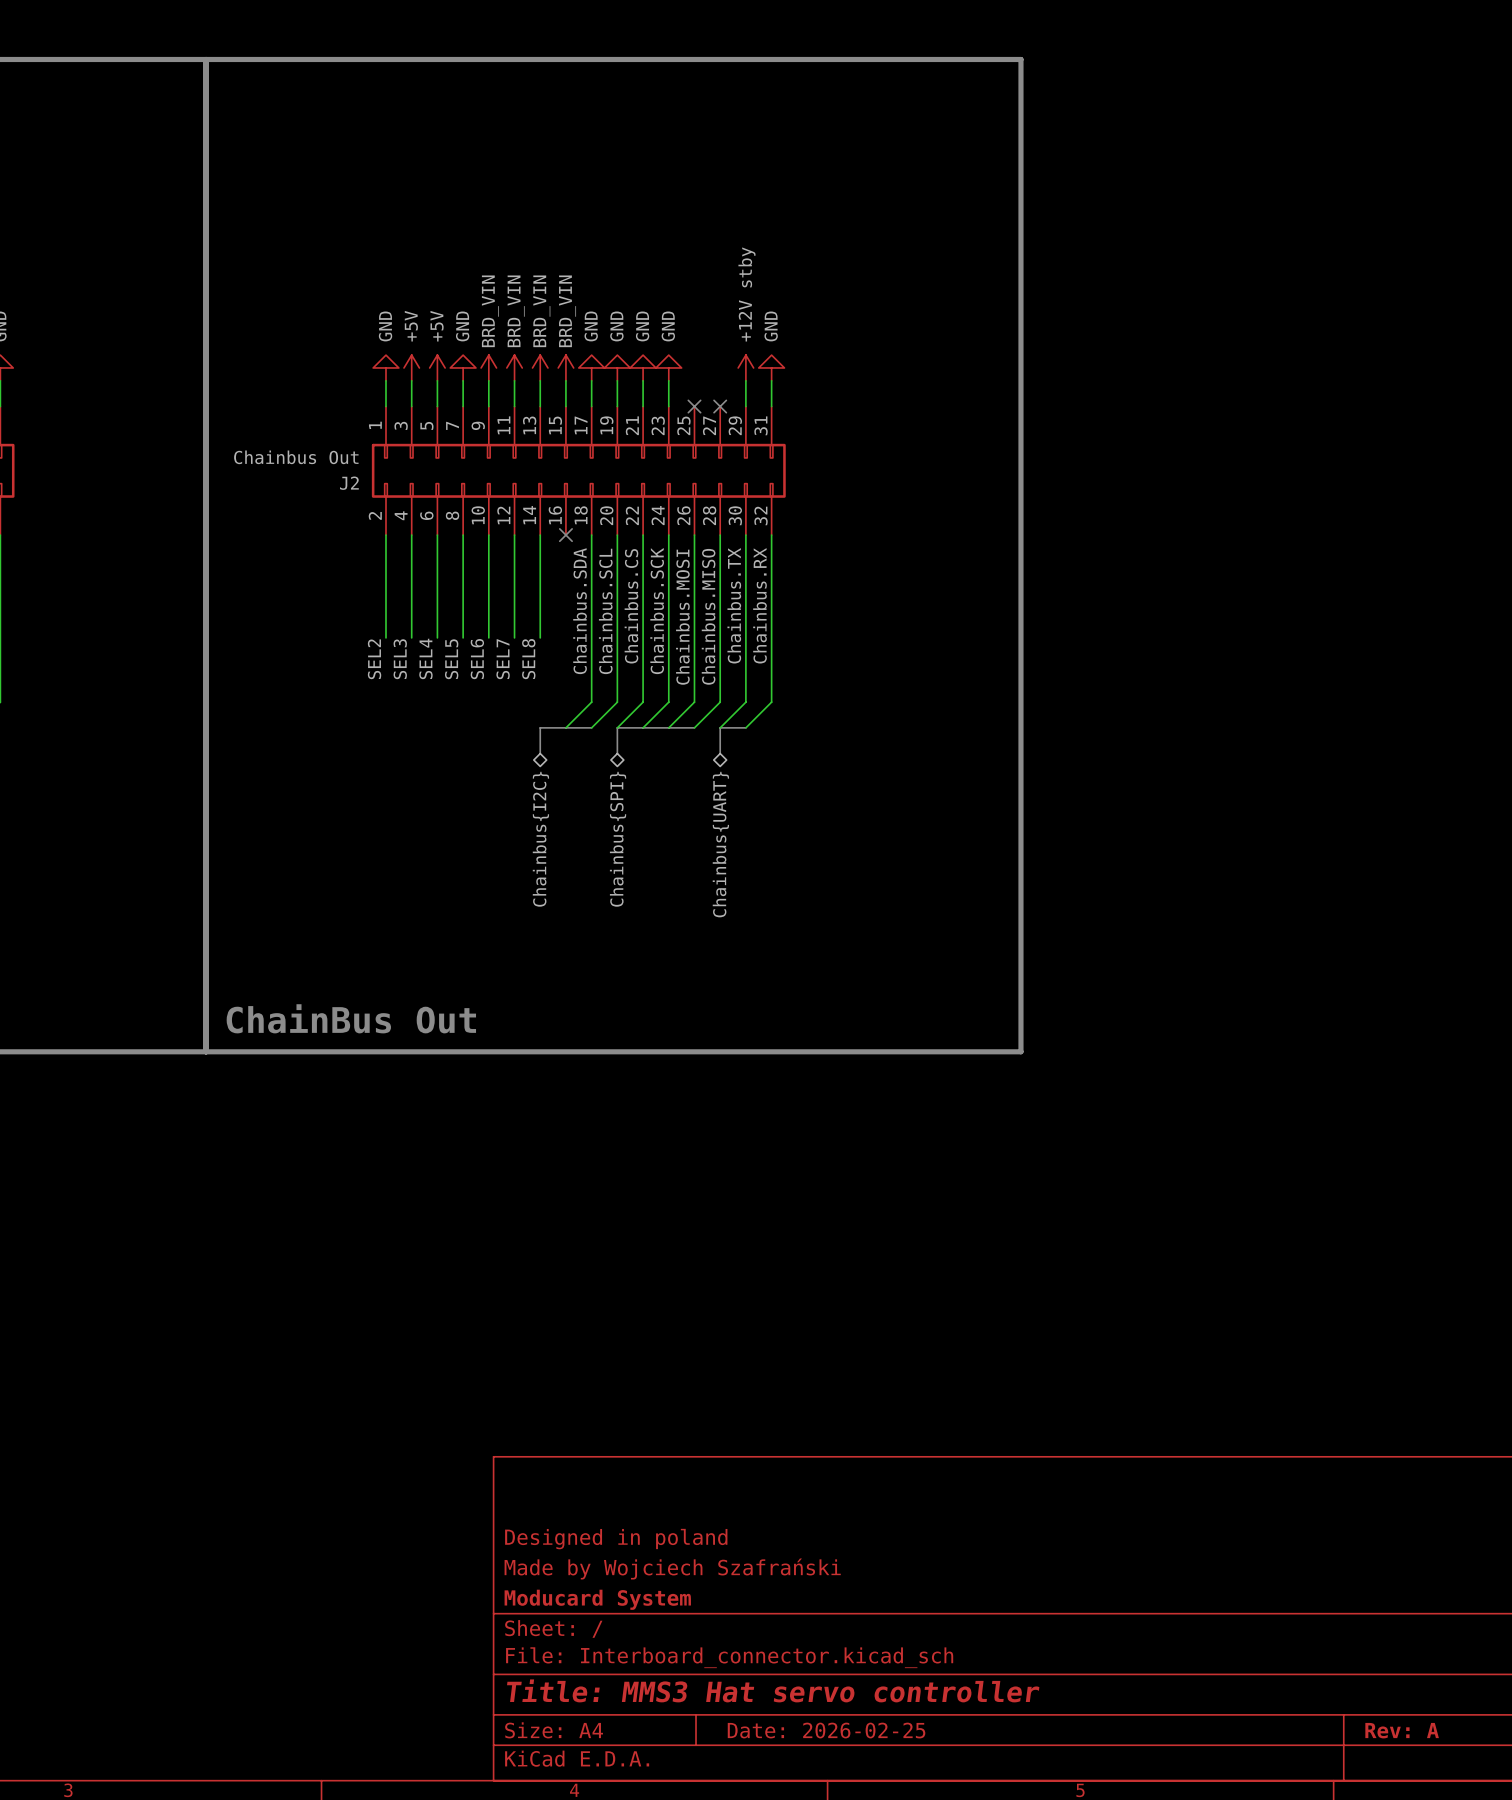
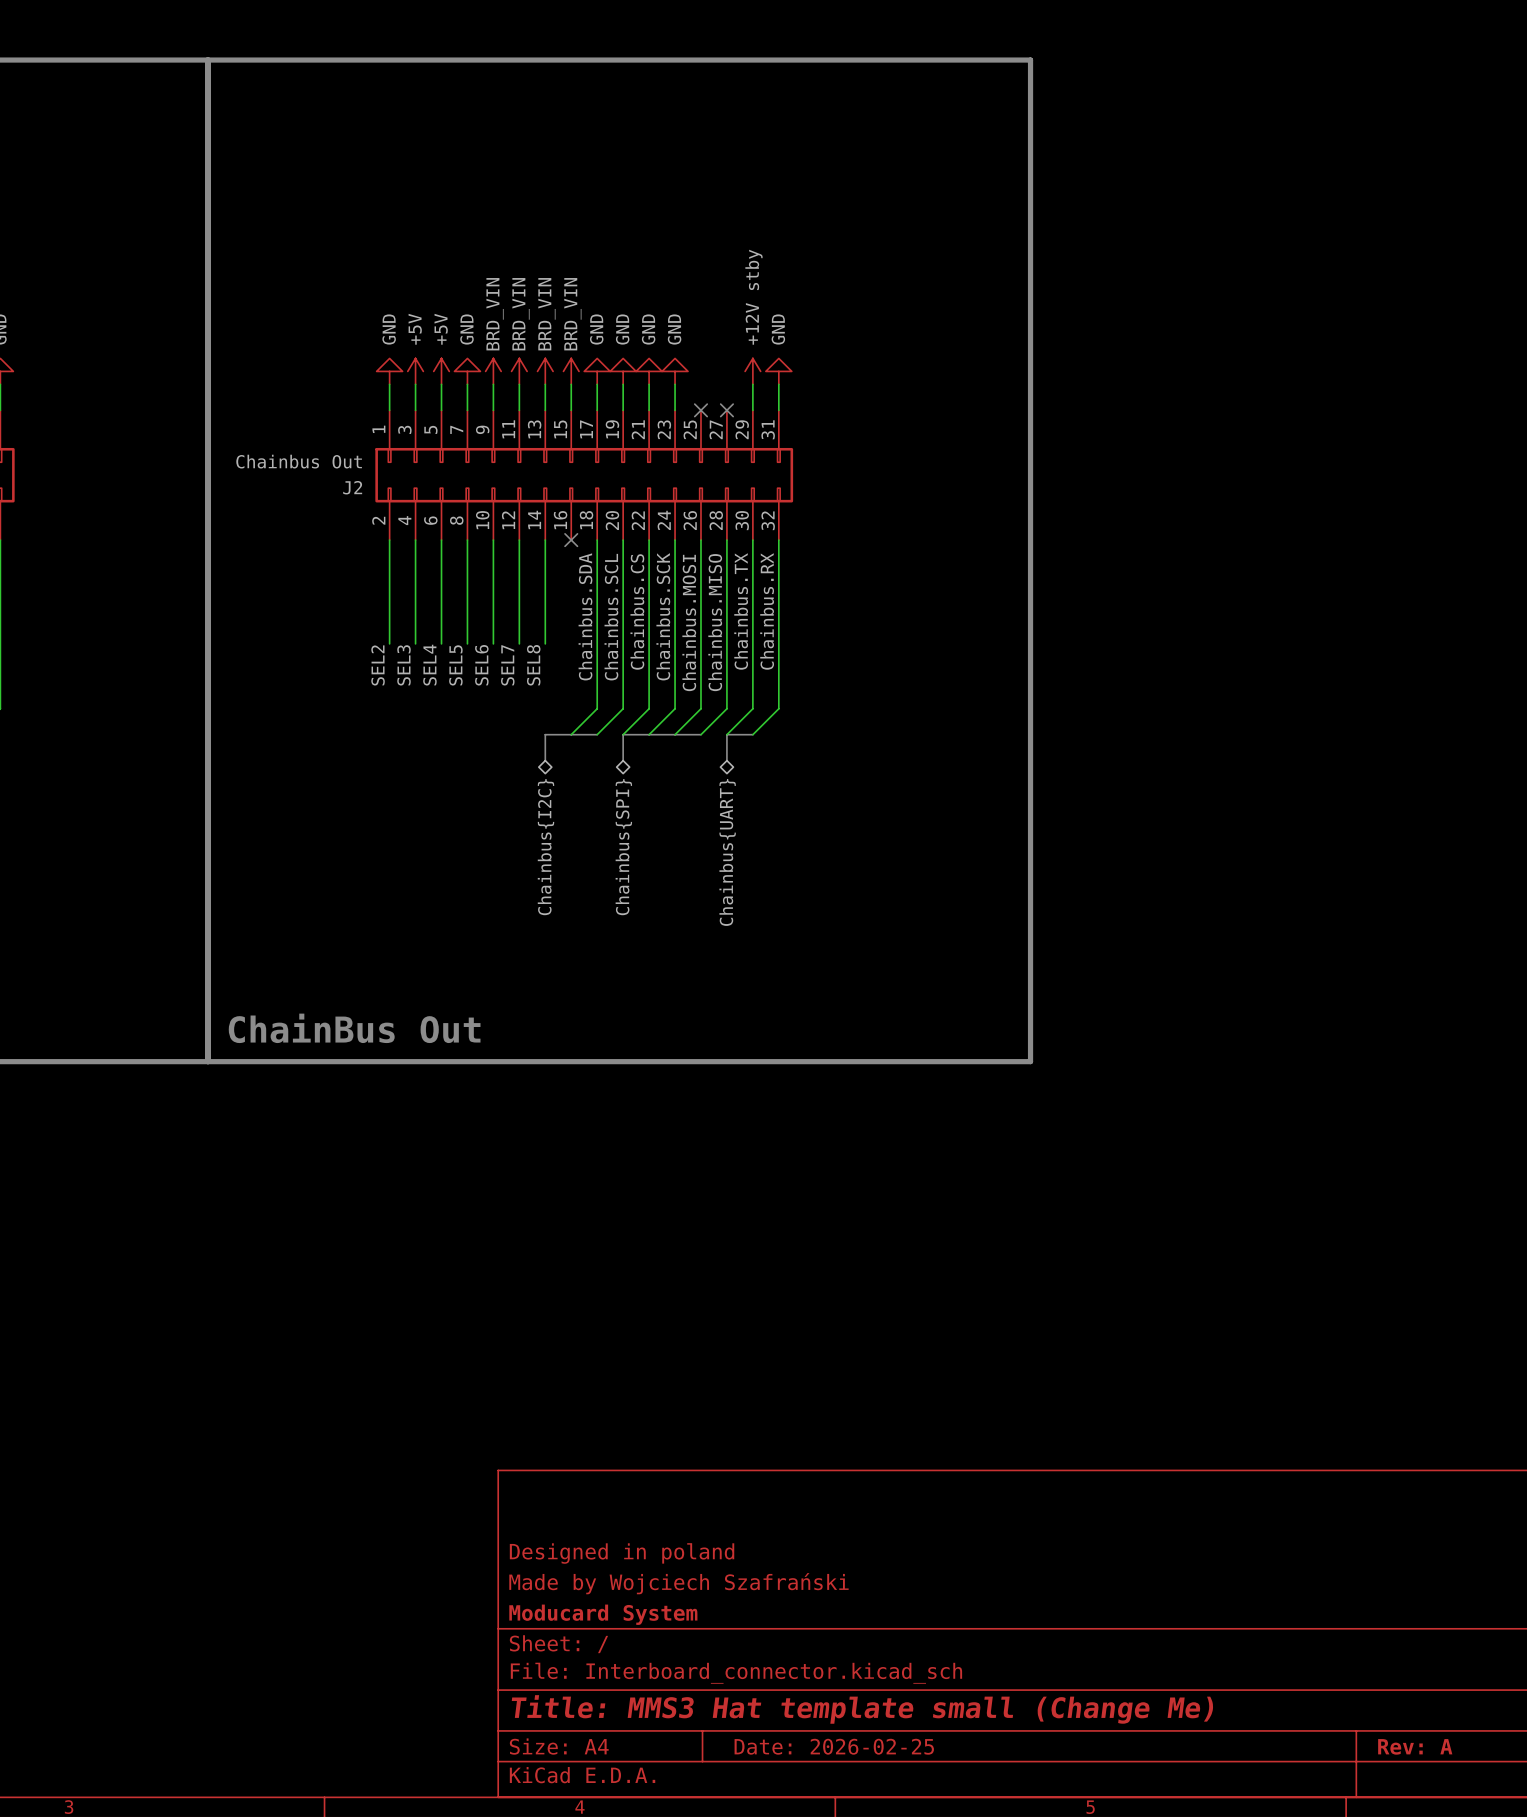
title block: Title: MMS3 Hat servo controller (773, 1690) -> Title: MMS3 Hat template small (Change Me) (862, 1709)

